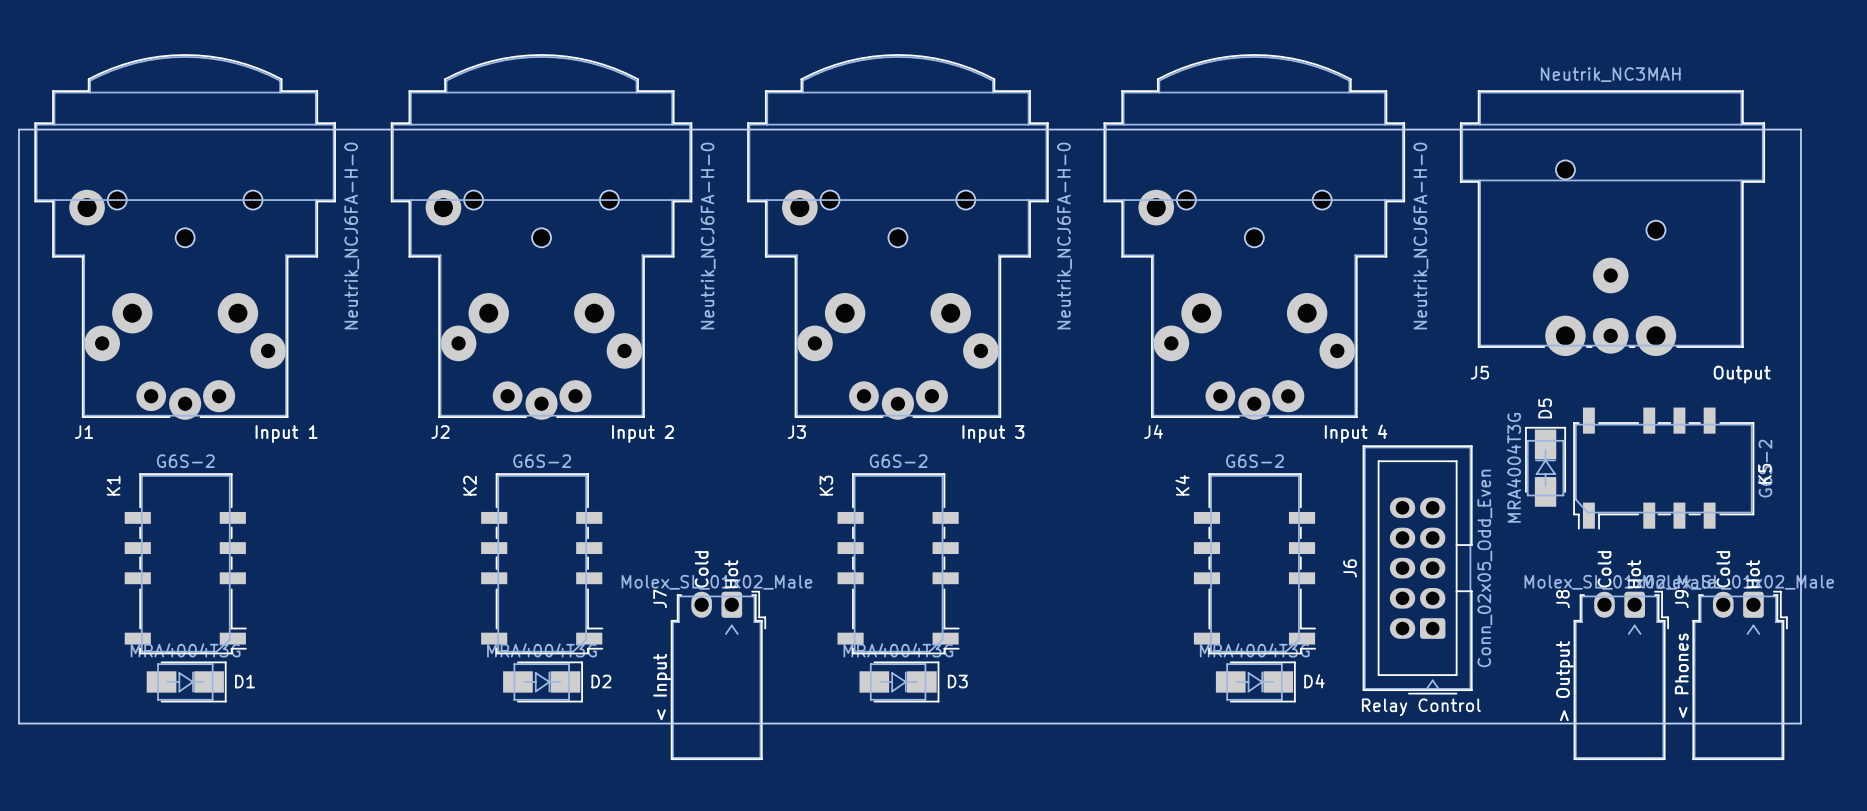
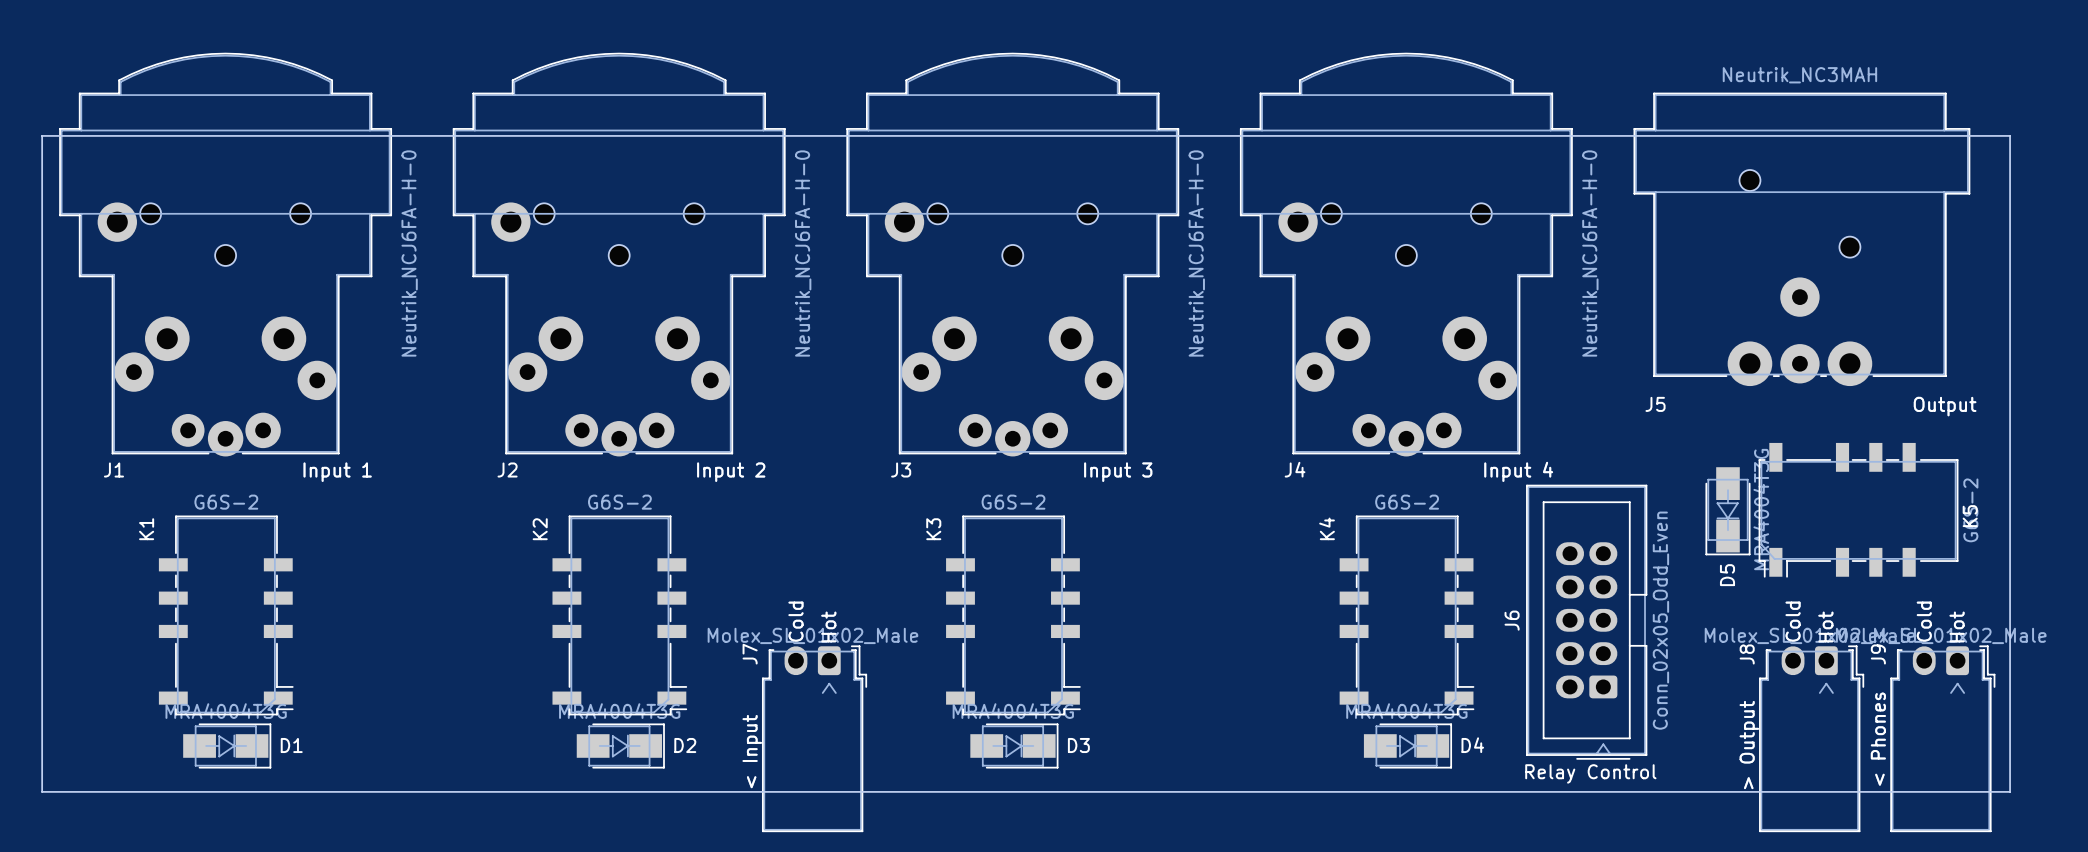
D5 rotation: 0° (1545, 466) -> 180° (1727, 511)

